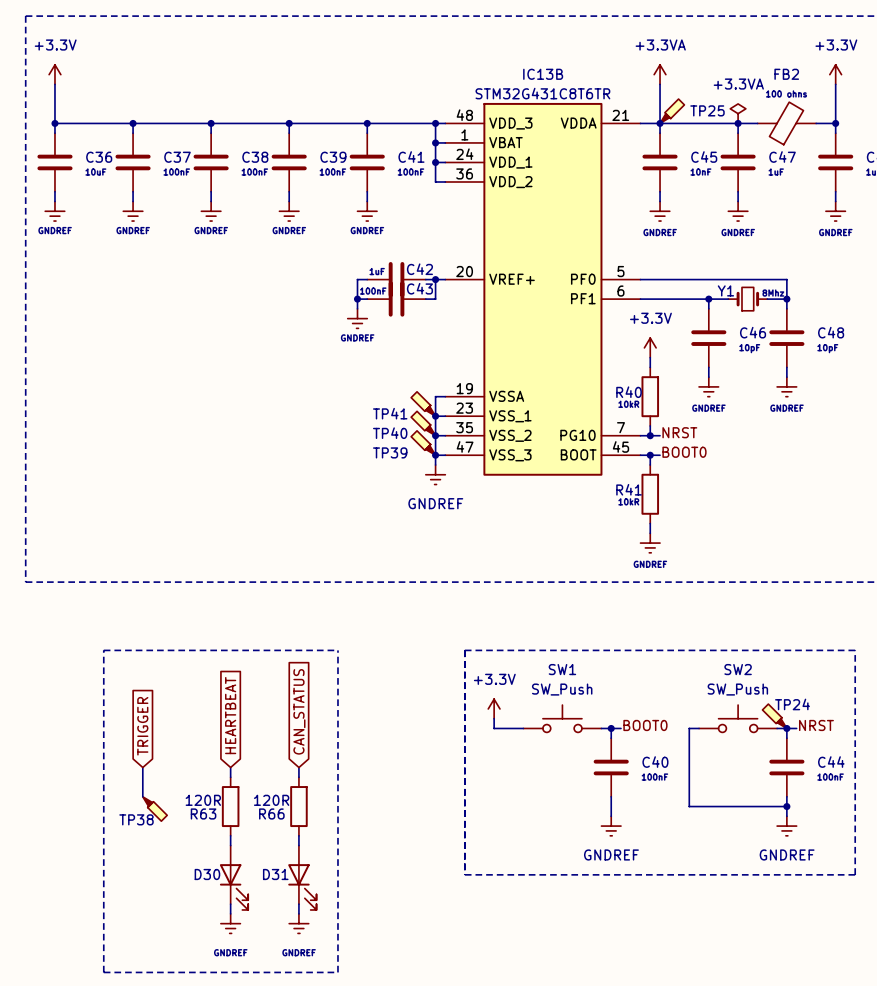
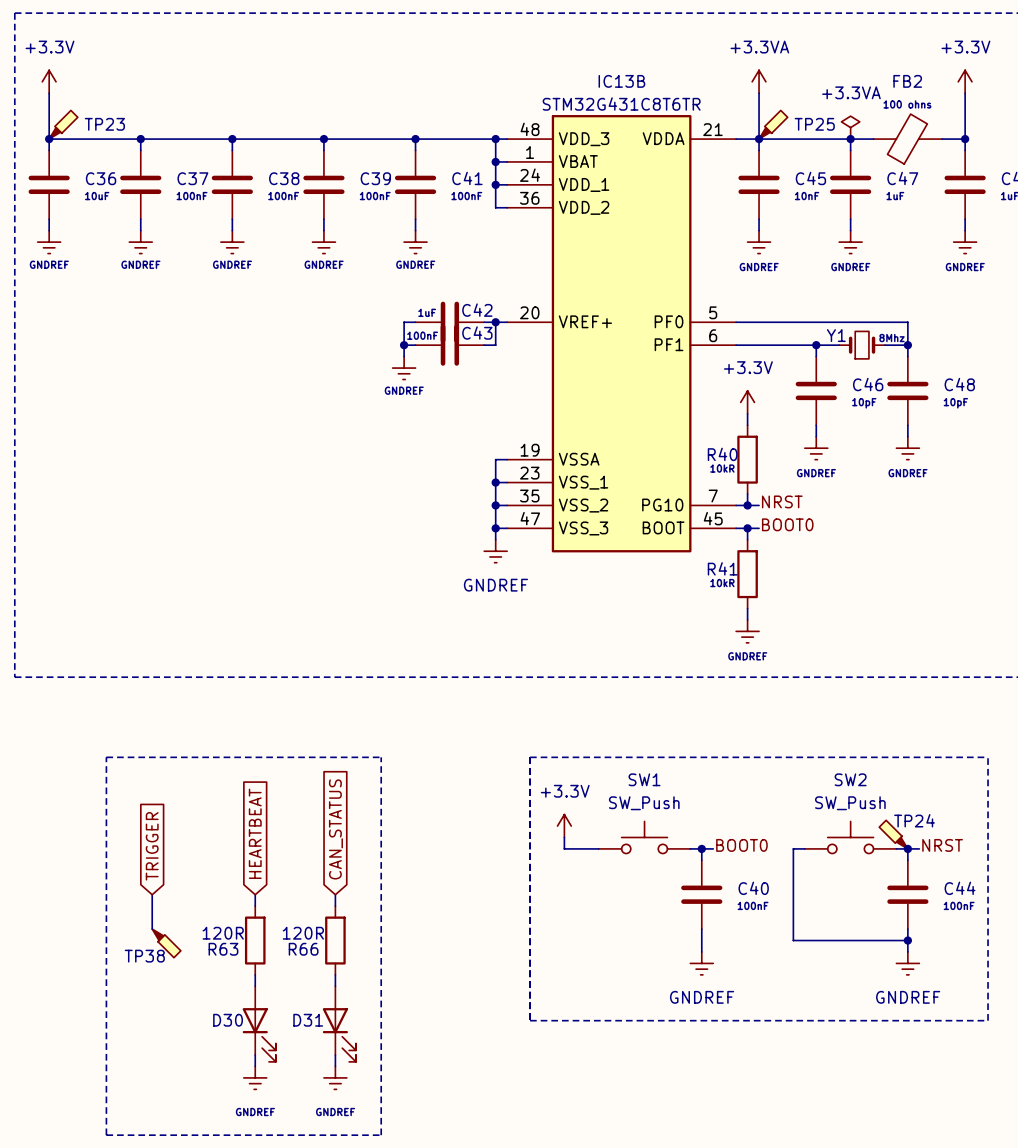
TP23: none -> (63, 124)
TP41: (423, 404) -> none
TP40: (423, 423) -> none
TP39: (423, 443) -> none

